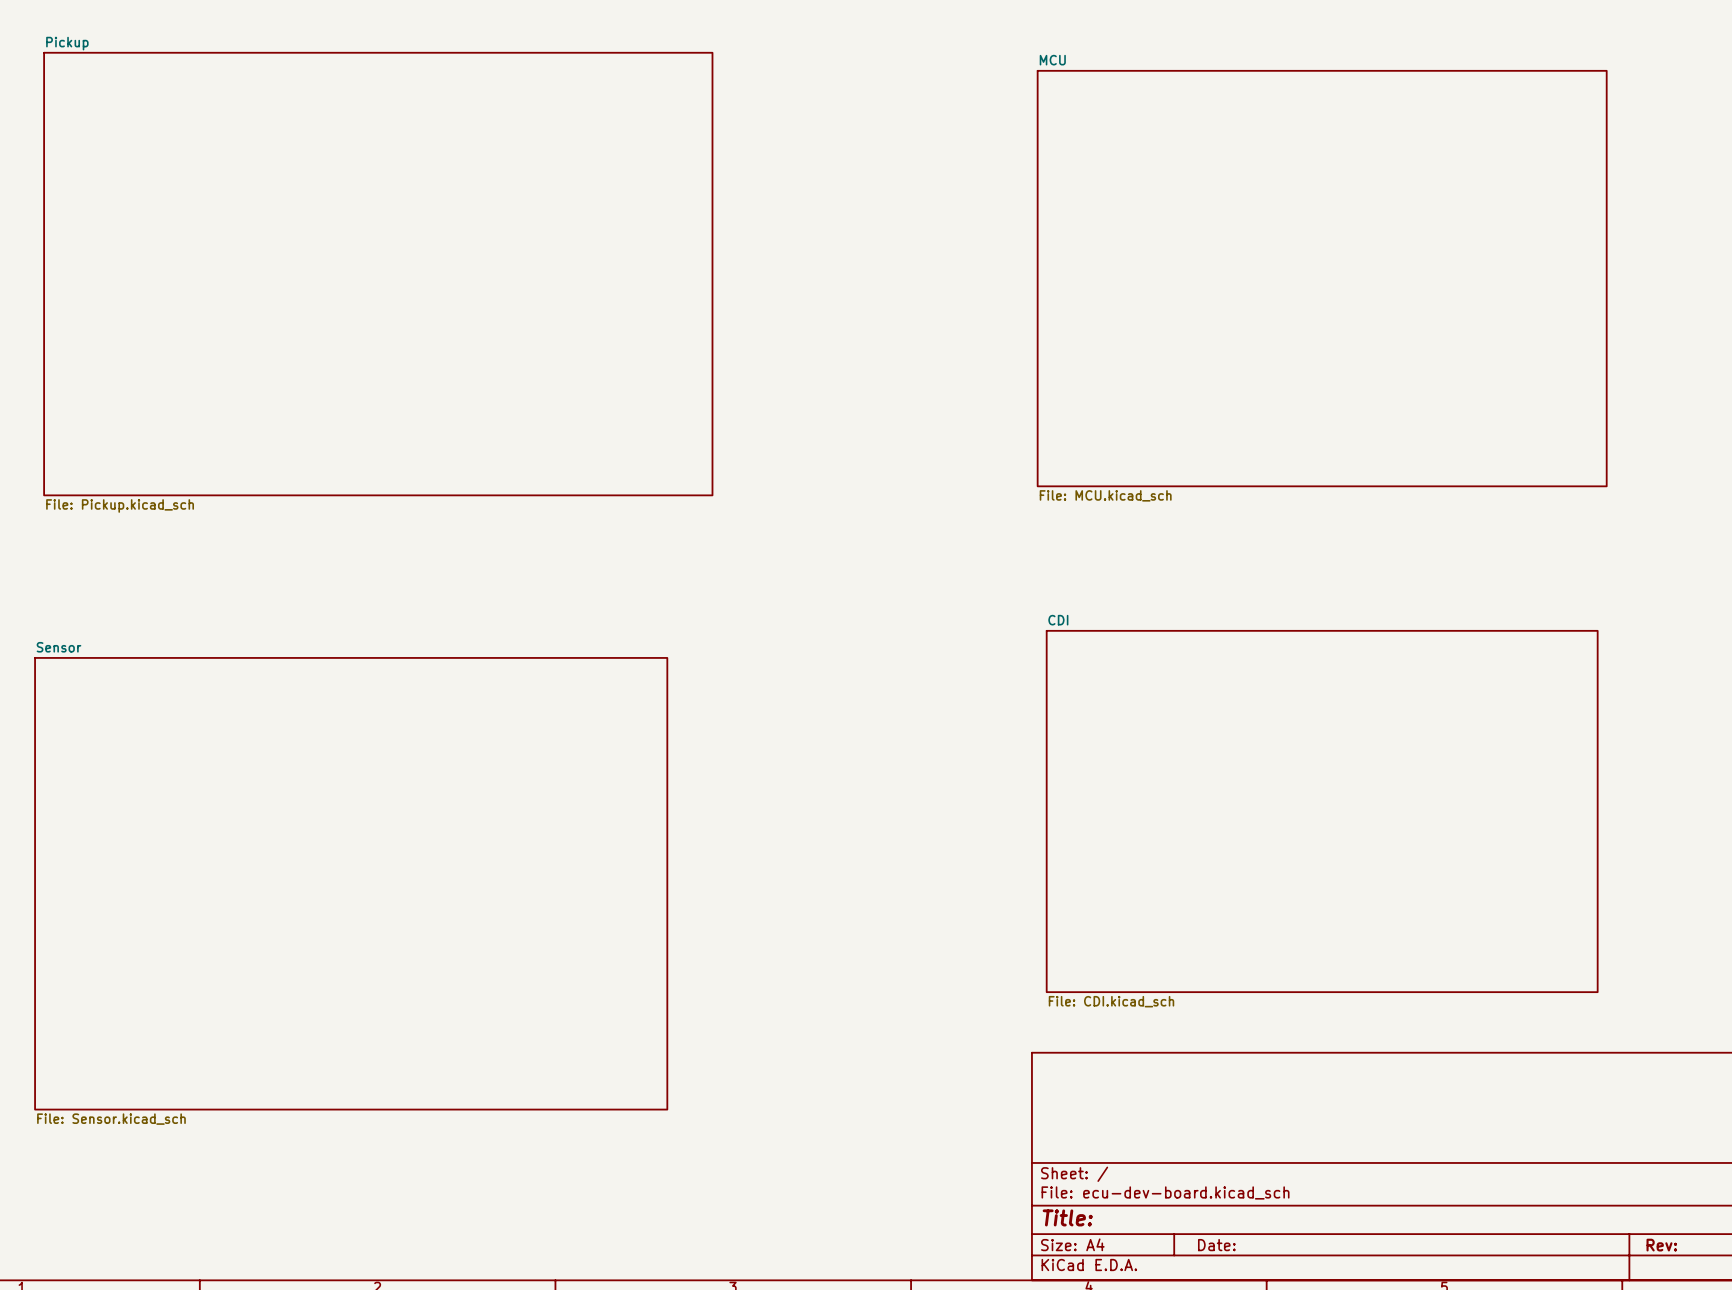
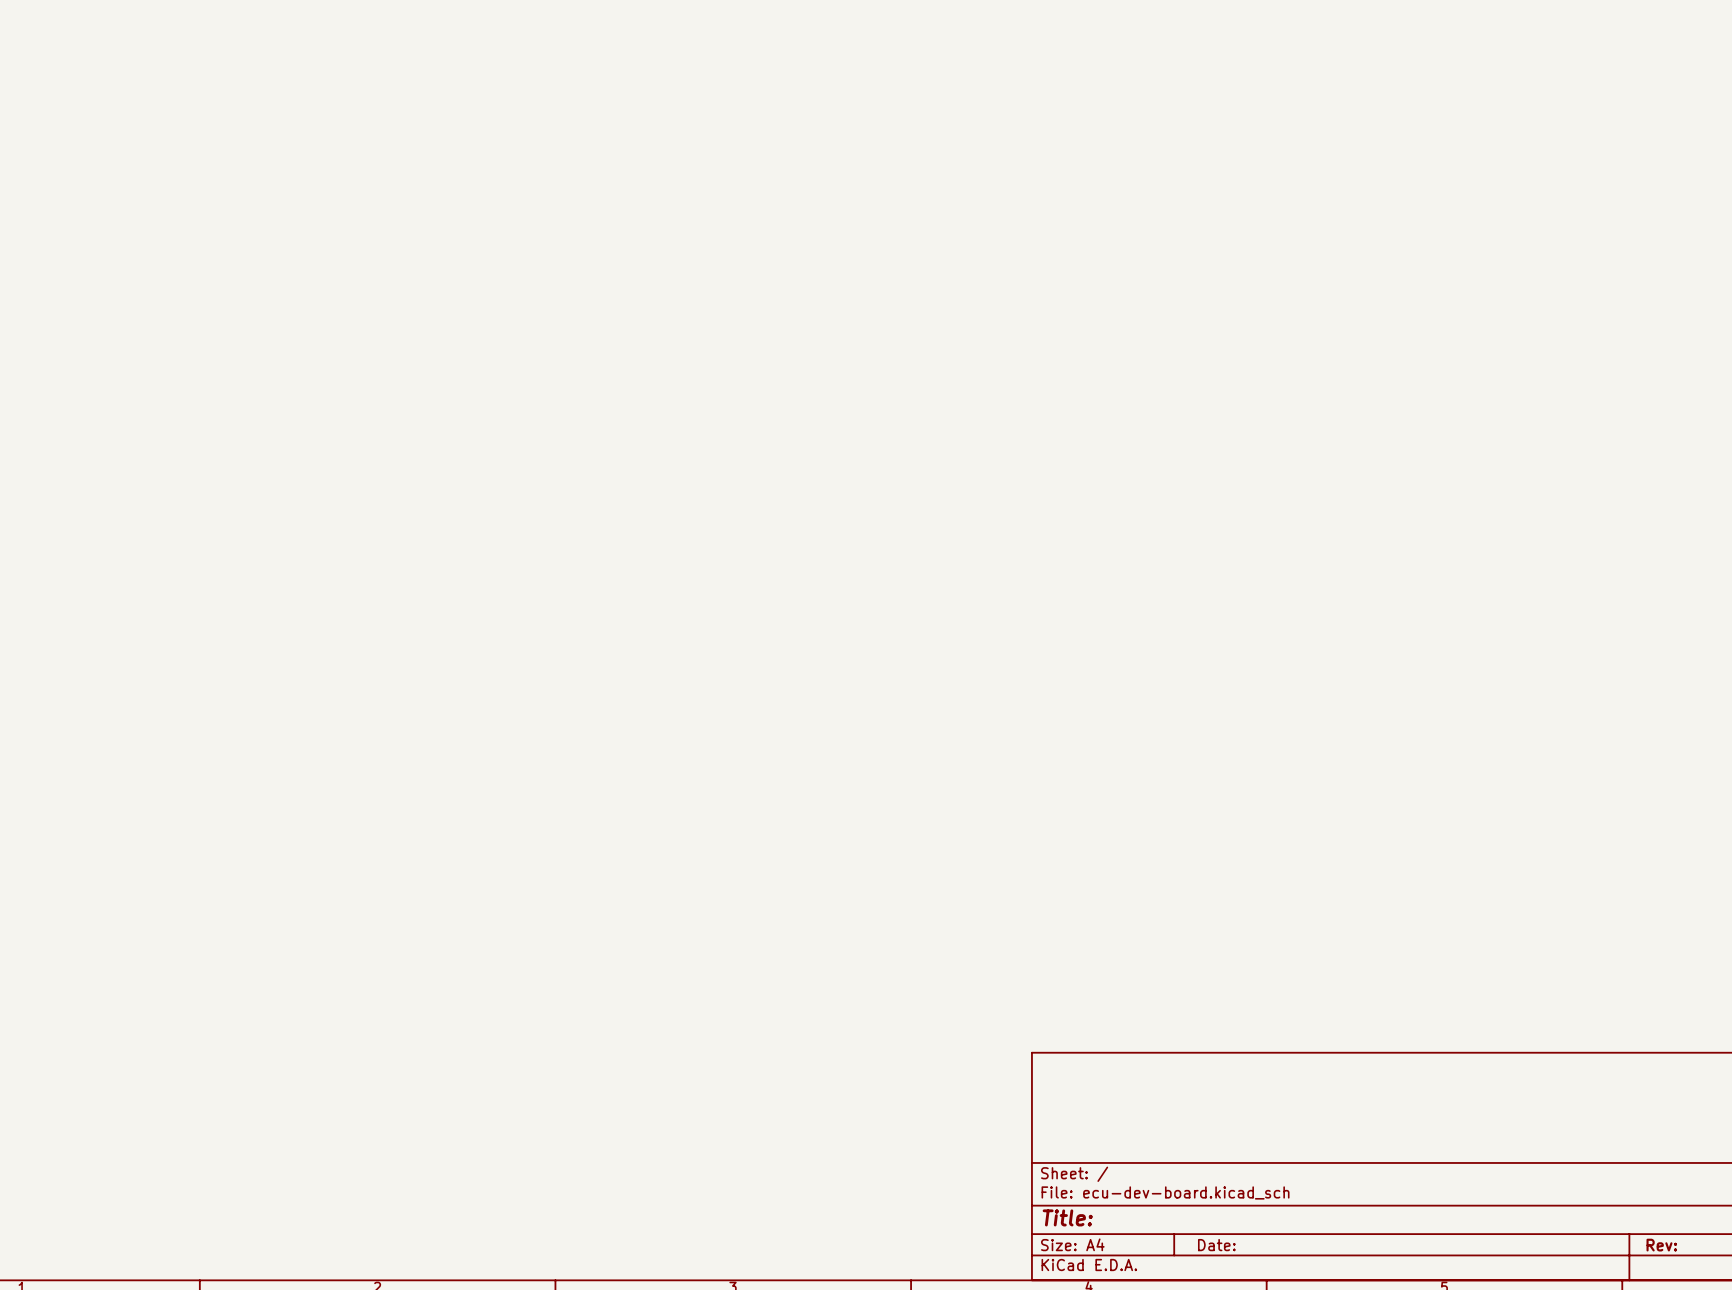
sheet Pickup: File: Pickup.kicad_sch (378, 274) -> none
sheet MCU: File: MCU.kicad_sch (1322, 278) -> none
sheet CDI: File: CDI.kicad_sch (1322, 811) -> none
sheet Sensor: File: Sensor.kicad_sch (351, 883) -> none

